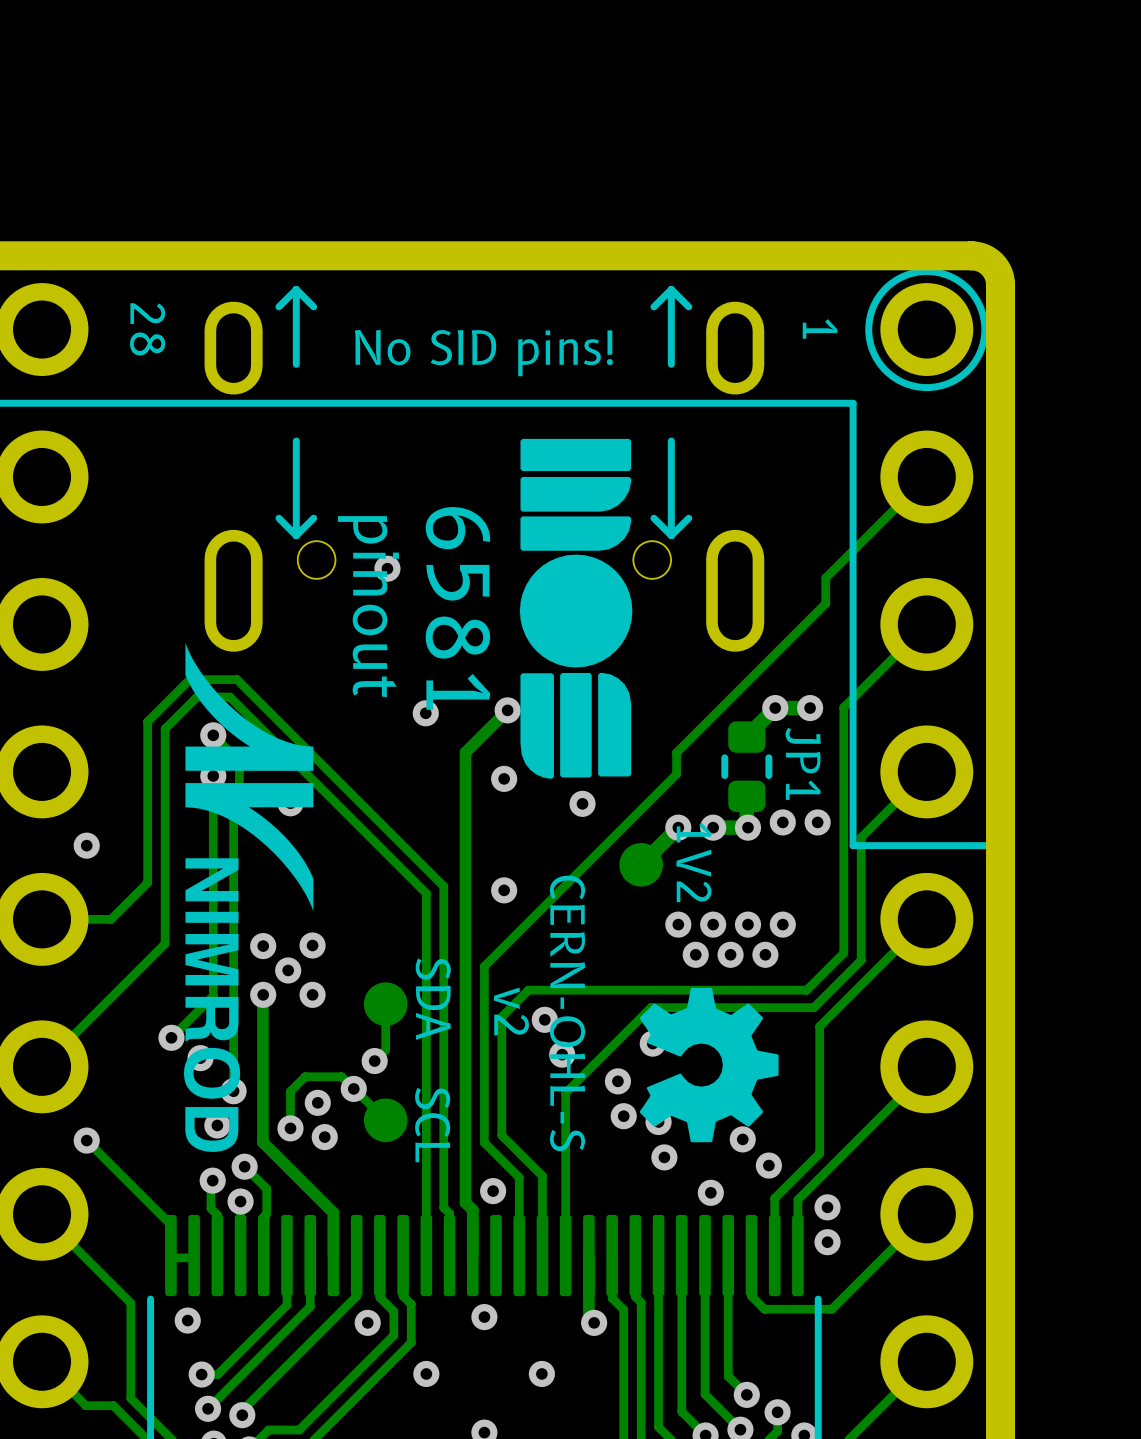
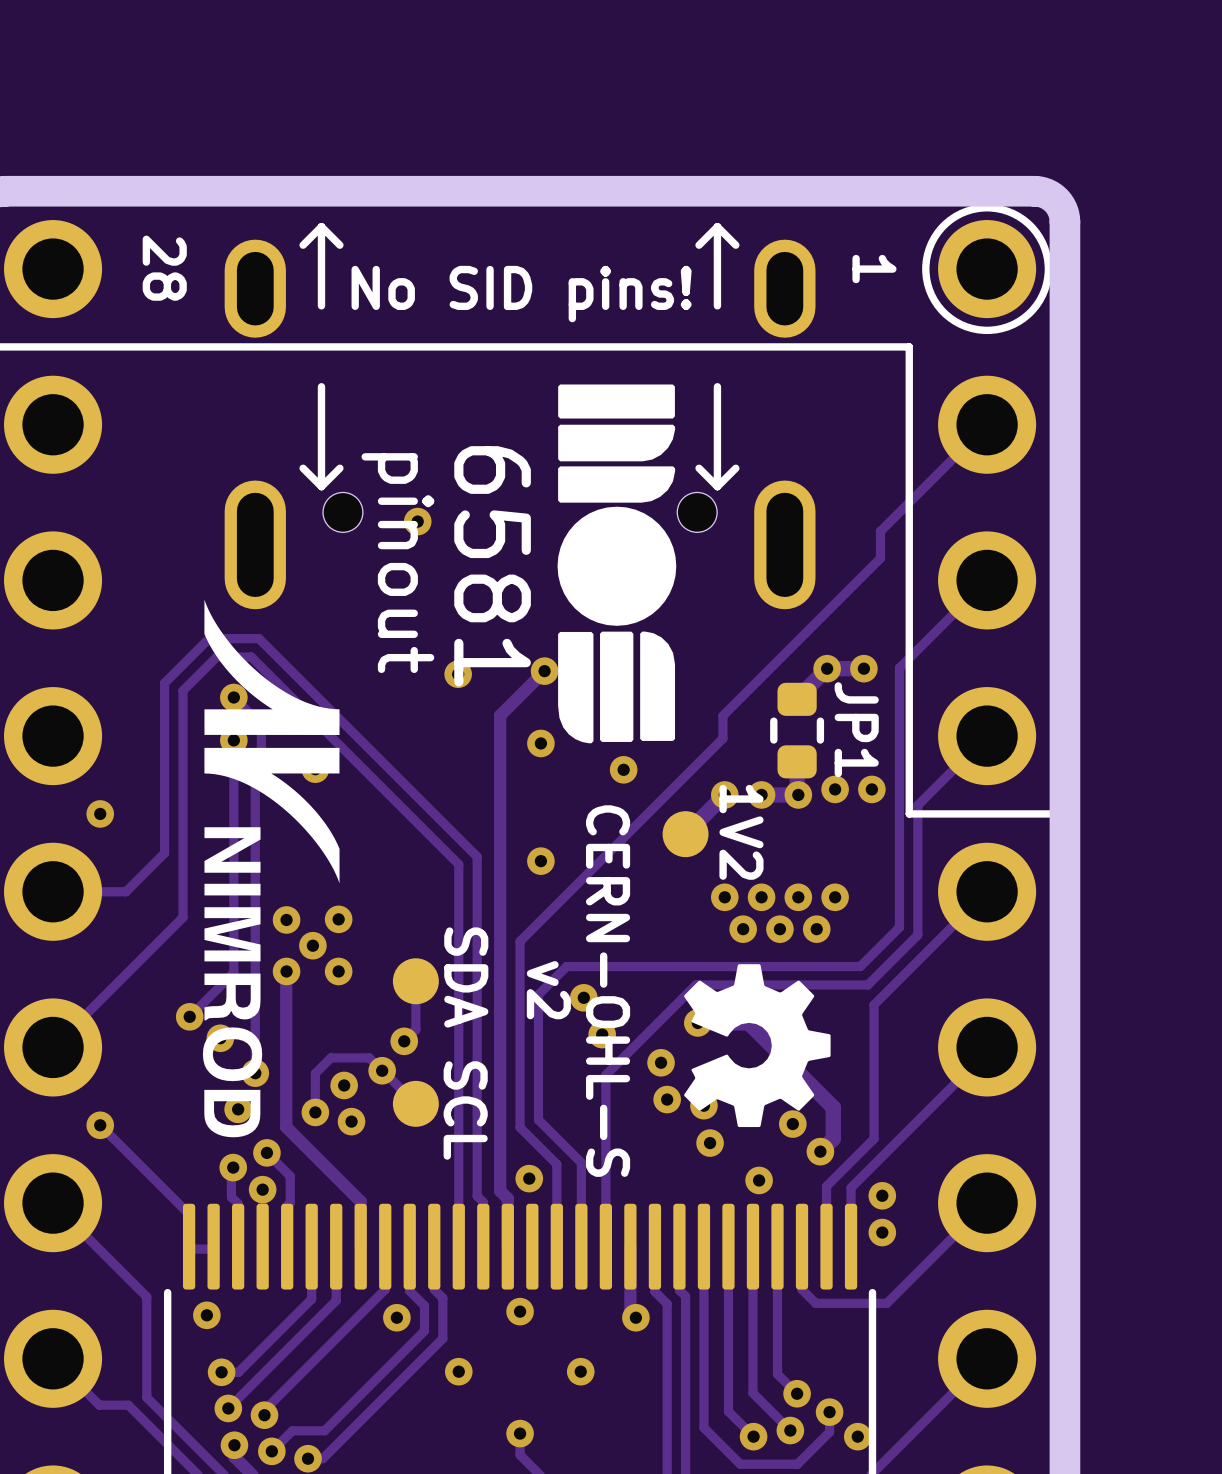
track: none -> (697, 1022) (748, 1022) (833, 1107) (833, 1138) (820, 1151)

